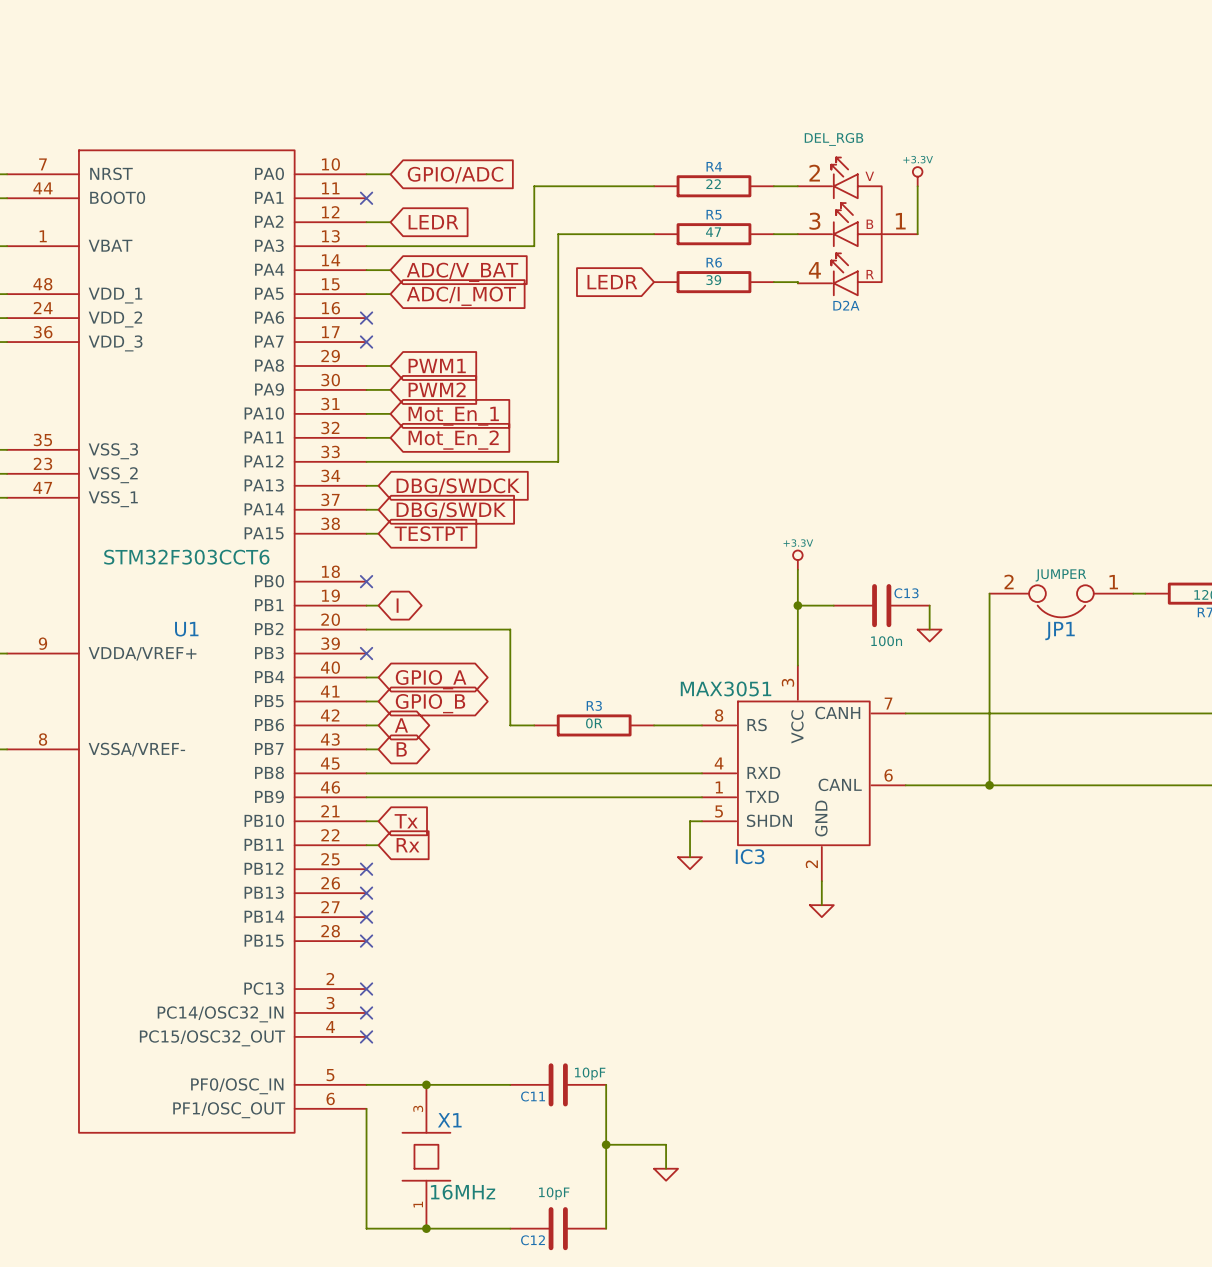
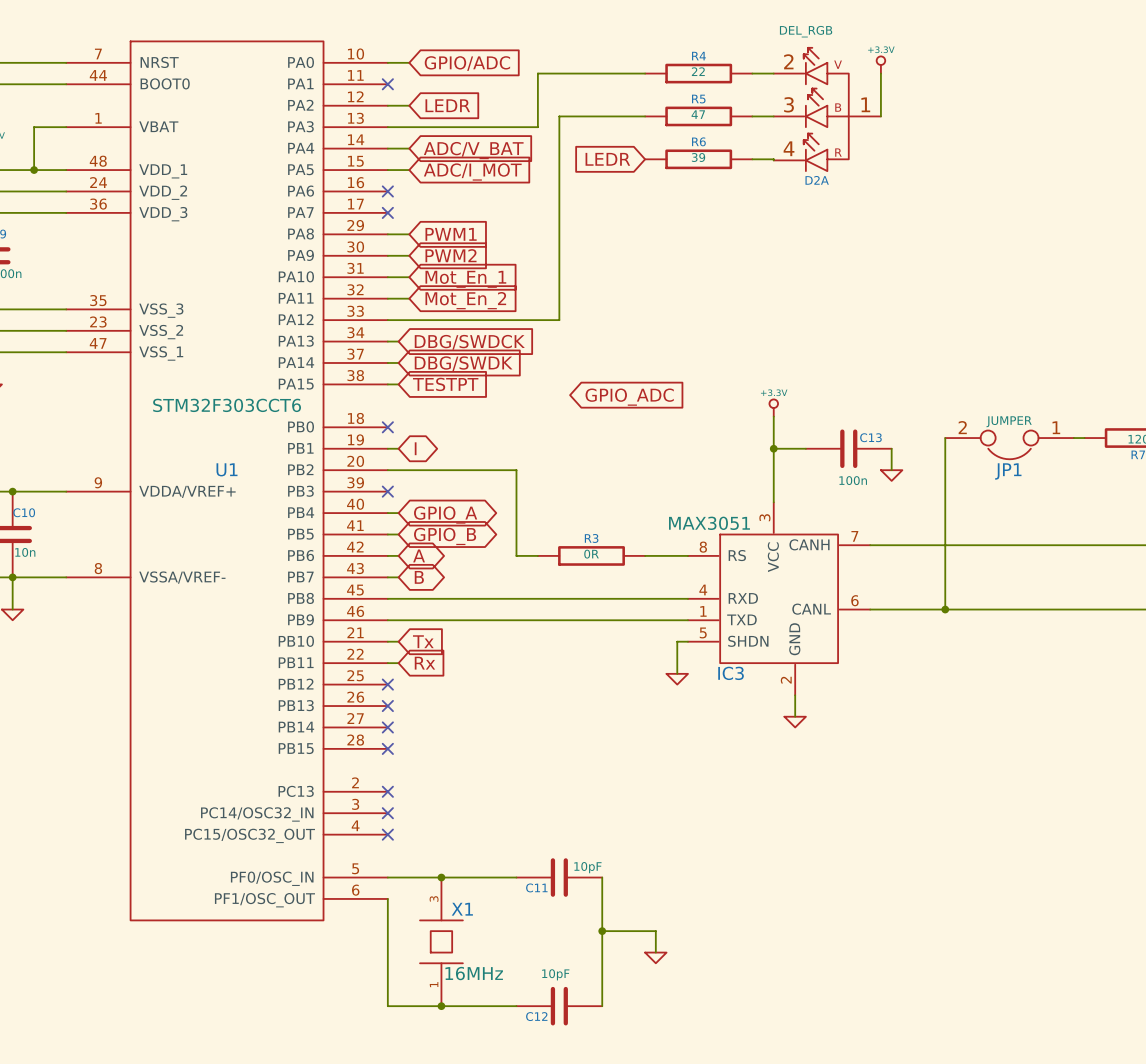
global label: none -> GPIO_ADC (629, 397)

